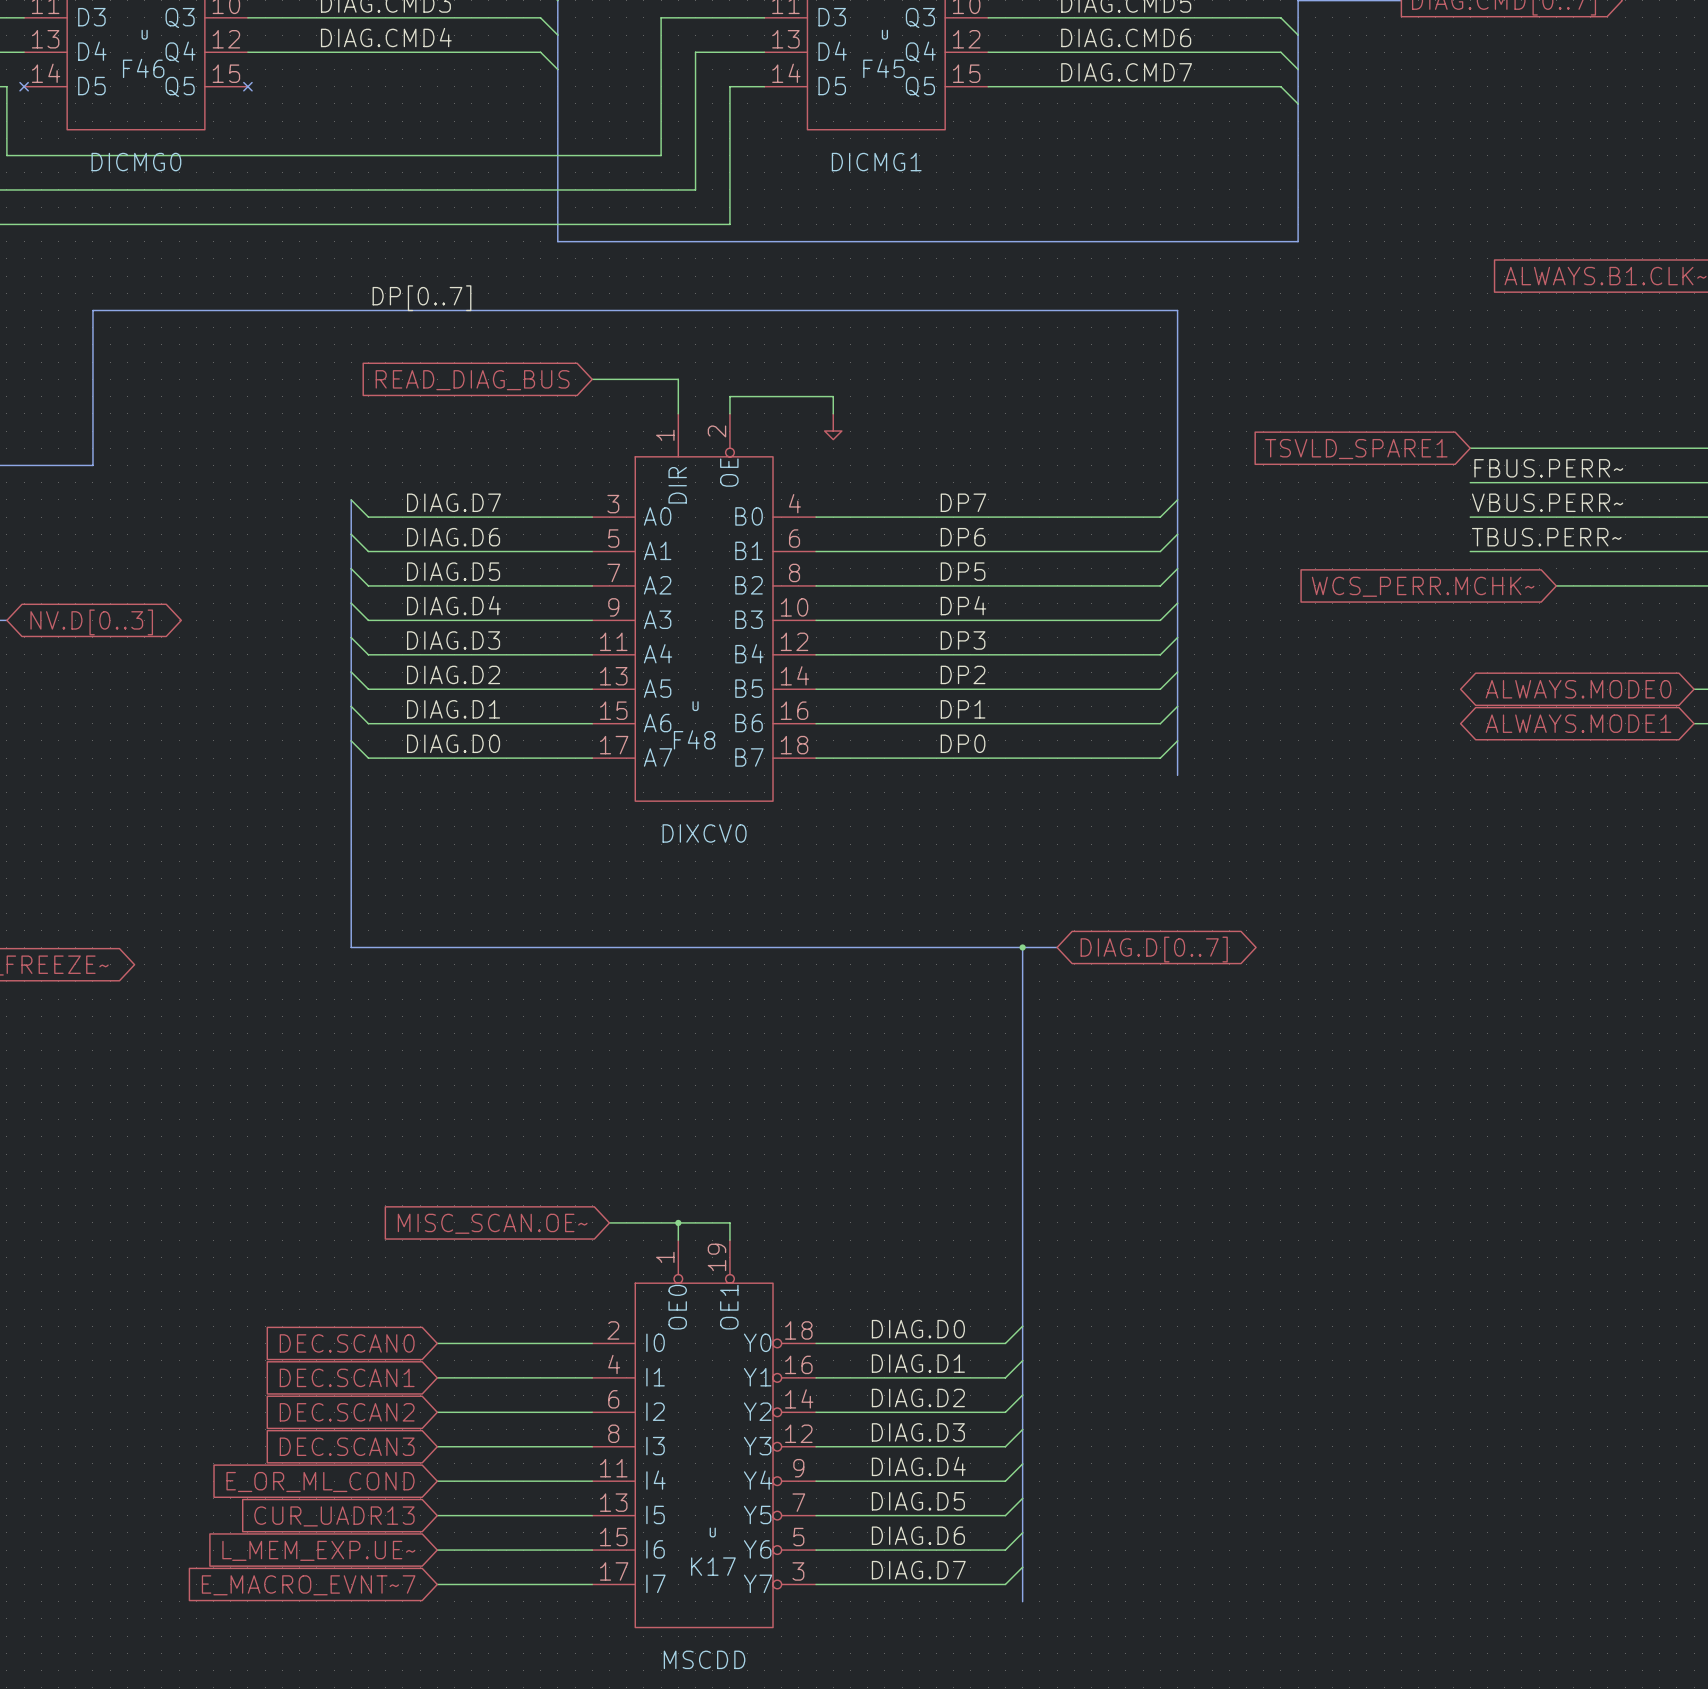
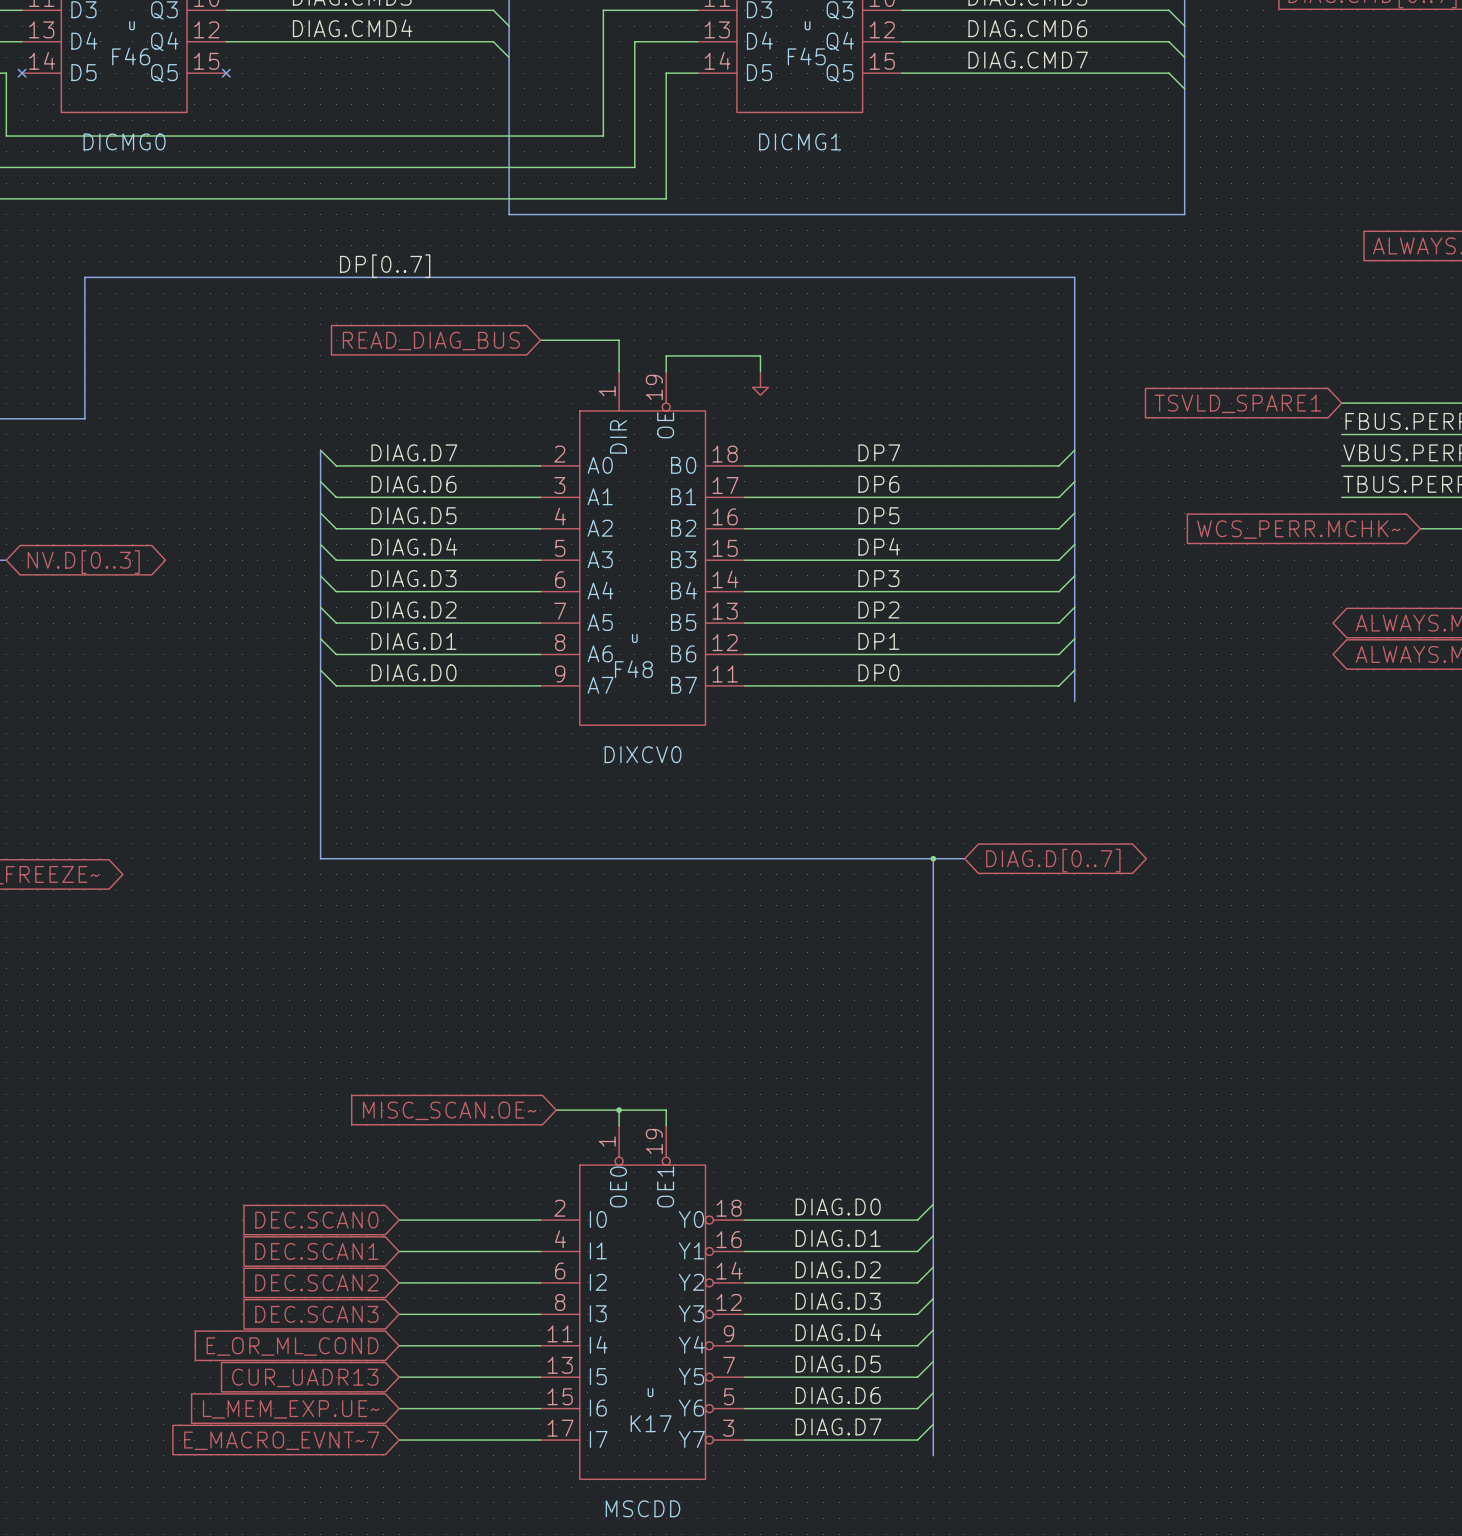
U symbol: [592, 413, 817, 802] -> [540, 371, 745, 726]

